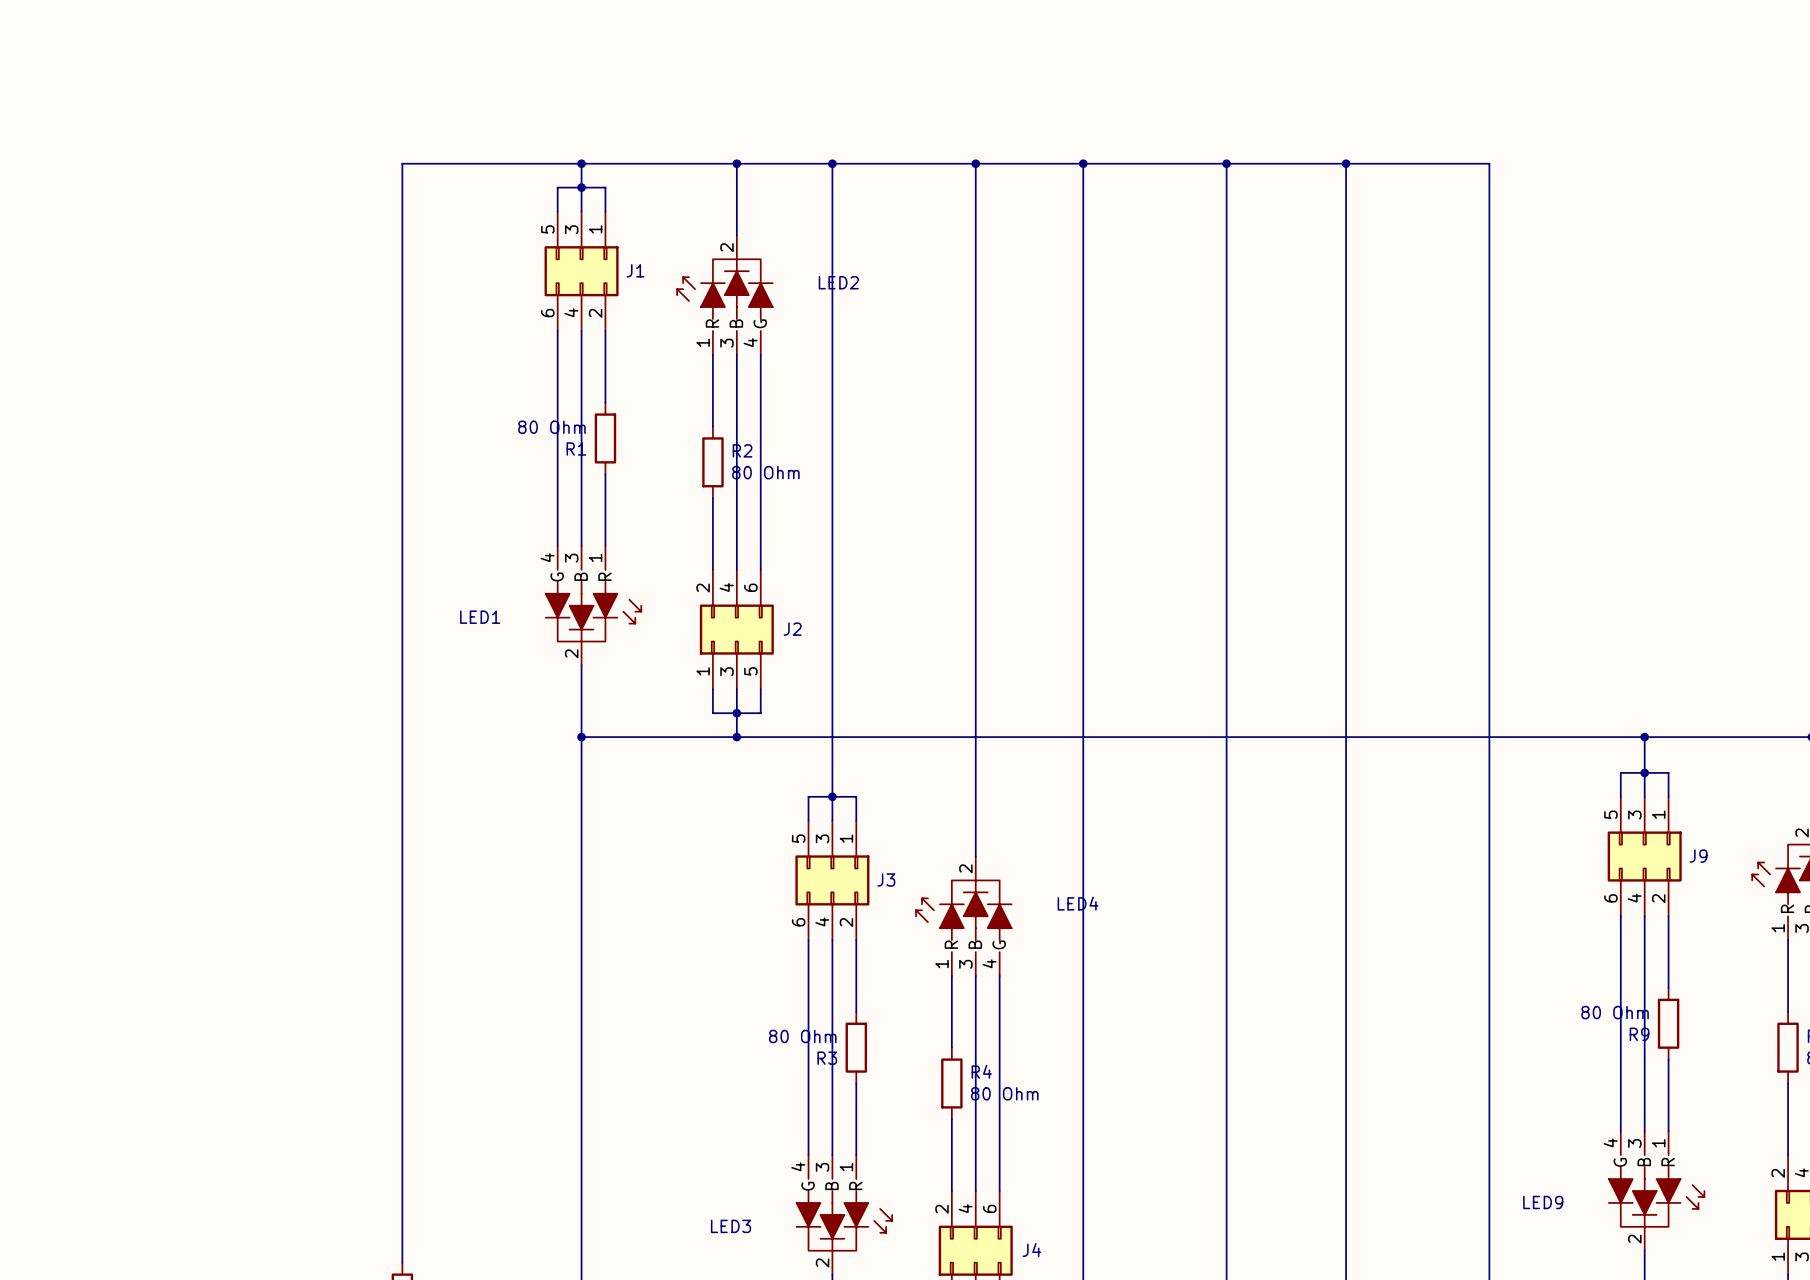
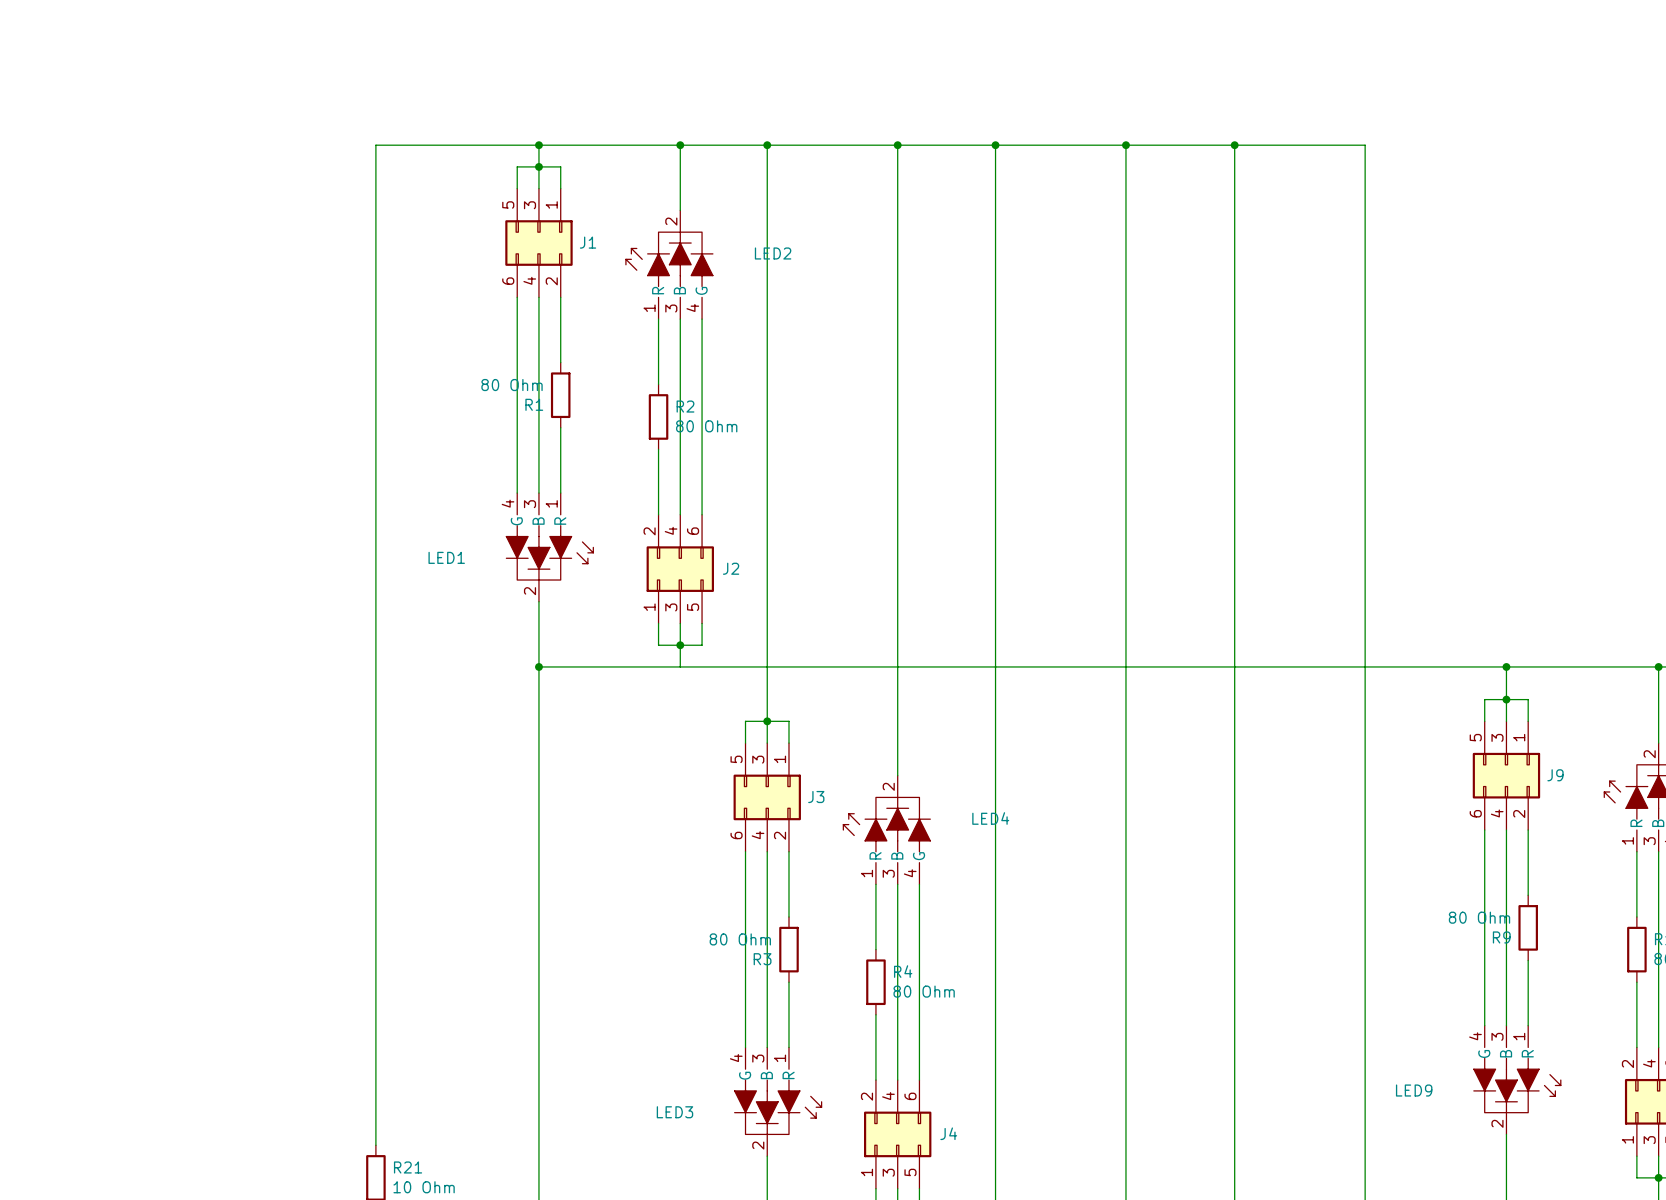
junction: (736, 737) -> none

